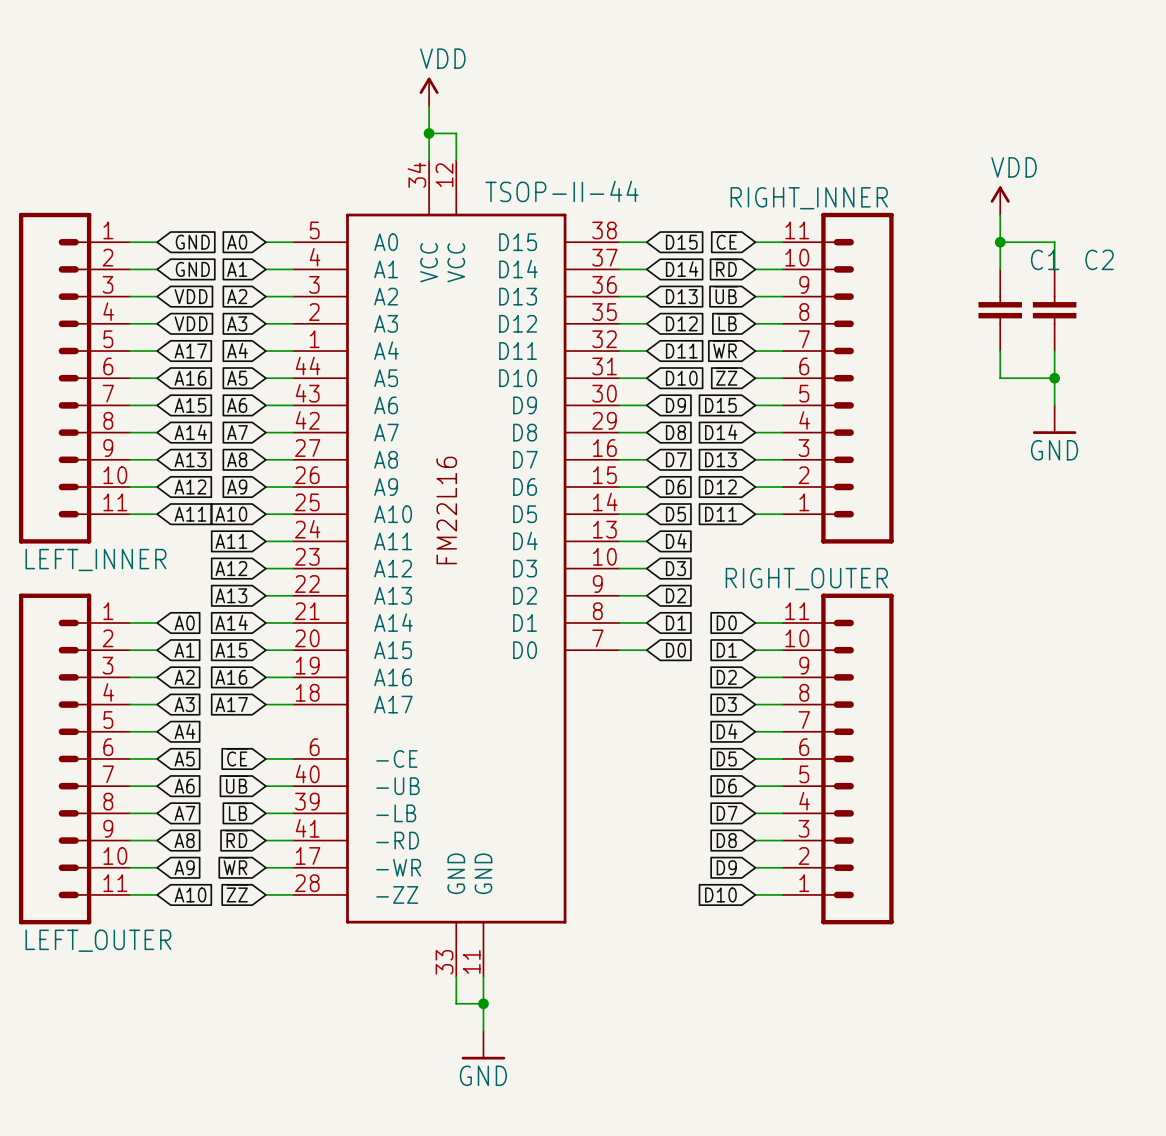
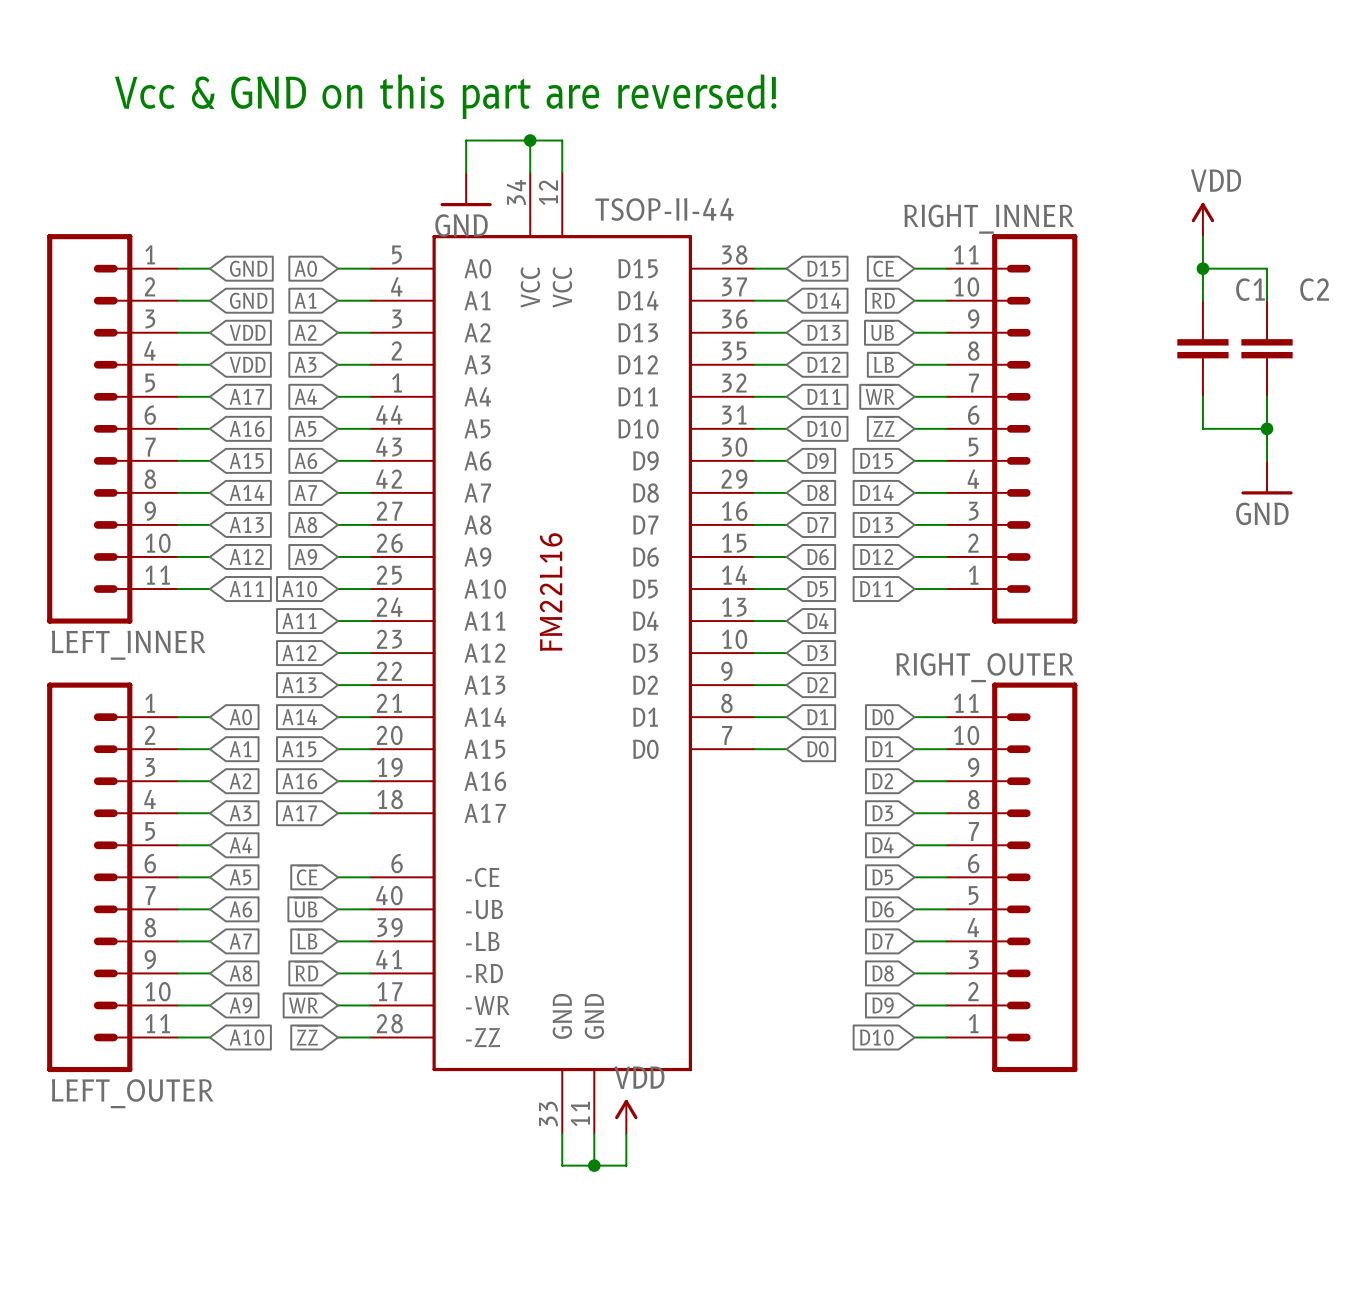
power symbol: VDD (429, 91) -> none
text: none -> Vcc & GND on this part are reversed! (445, 96)
wire: (429, 106) (429, 133) -> (466, 172) (466, 140) (530, 140)
power symbol: none -> GND (466, 189)
power symbol: none -> VDD (626, 1116)
wire: (483, 1003) (483, 1030) -> (594, 1165) (626, 1165) (626, 1133)
power symbol: GND (483, 1045) -> none

